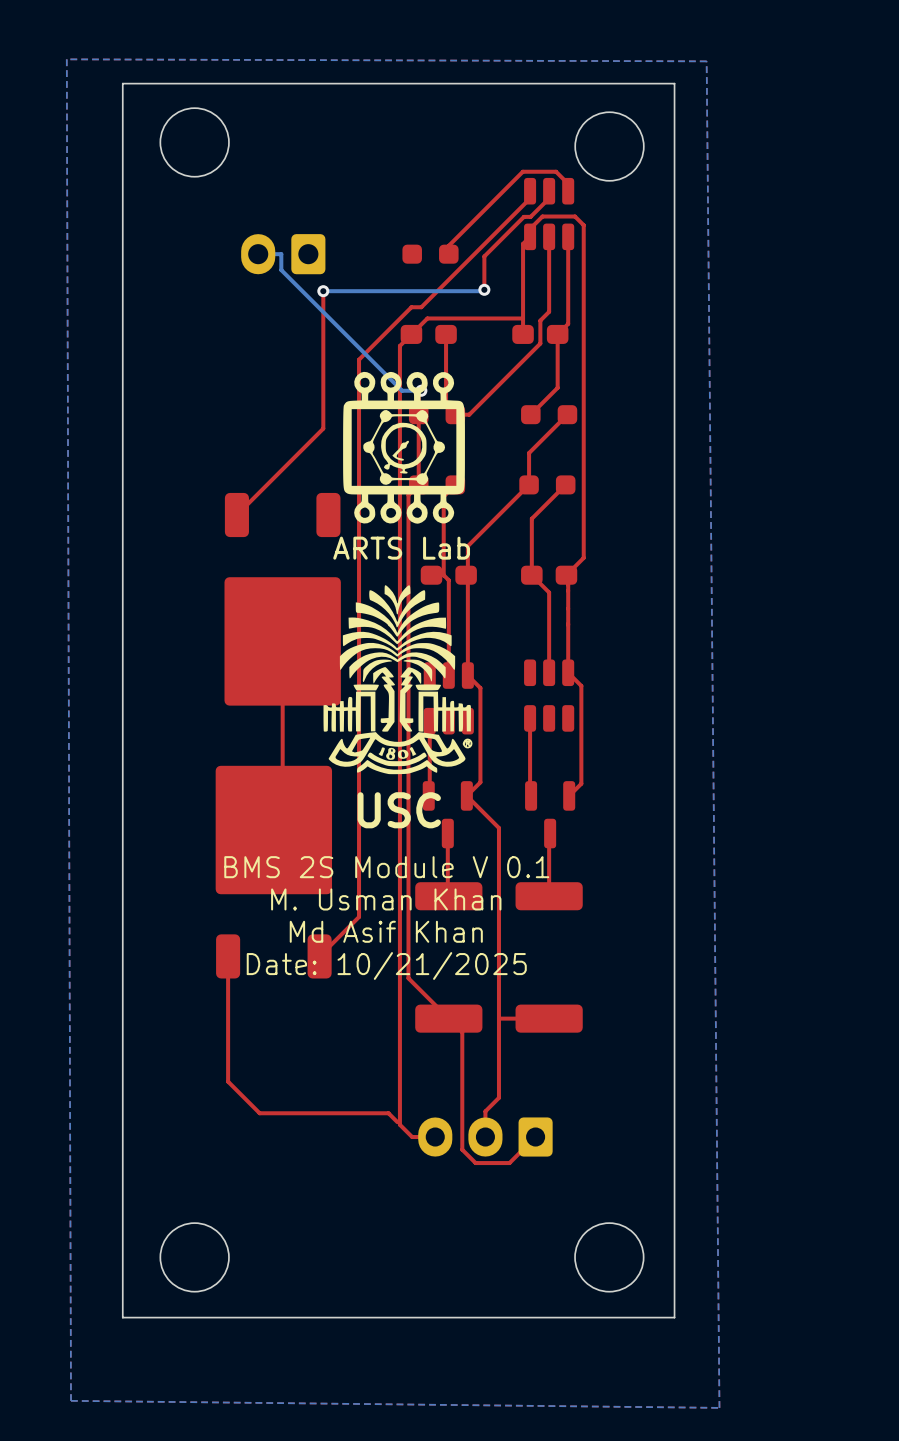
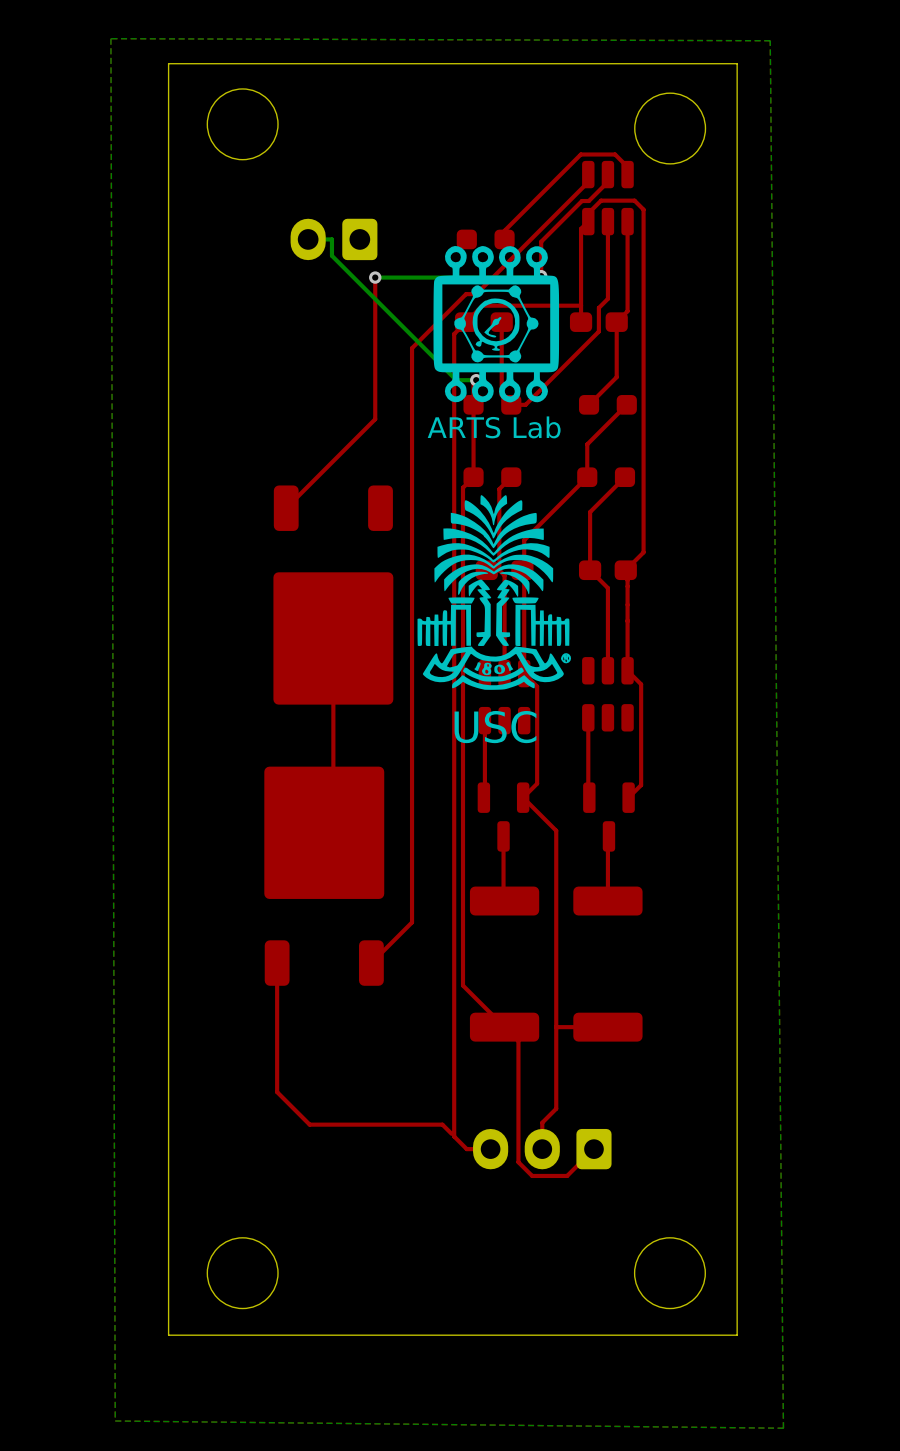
ARTS Lab position: (404, 447) -> (496, 324)
USC position: (398, 679) -> (494, 592)
text: BMS 2S Module V 0.1 (386, 867) -> none
text: M. Usman Khan (386, 899) -> none
text: Md Asif Khan (386, 931) -> none
text: Date: 10/21/2025 (386, 965) -> none

